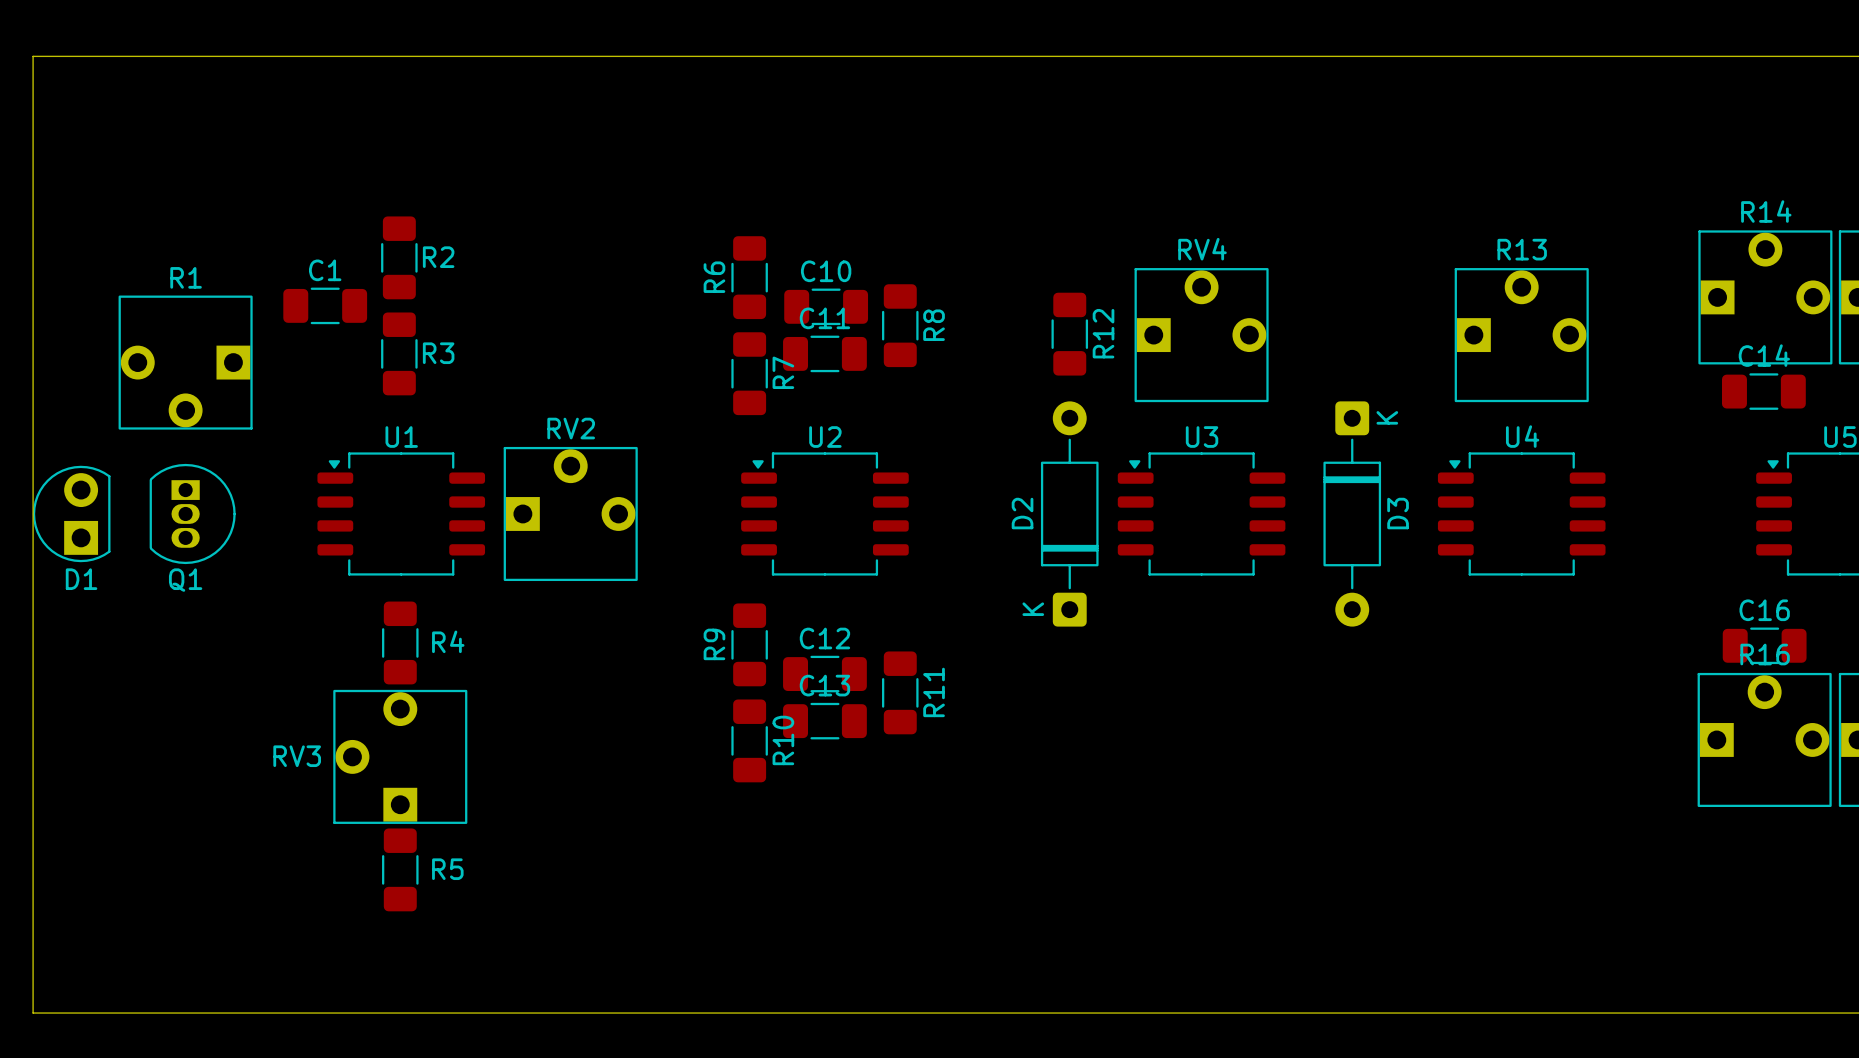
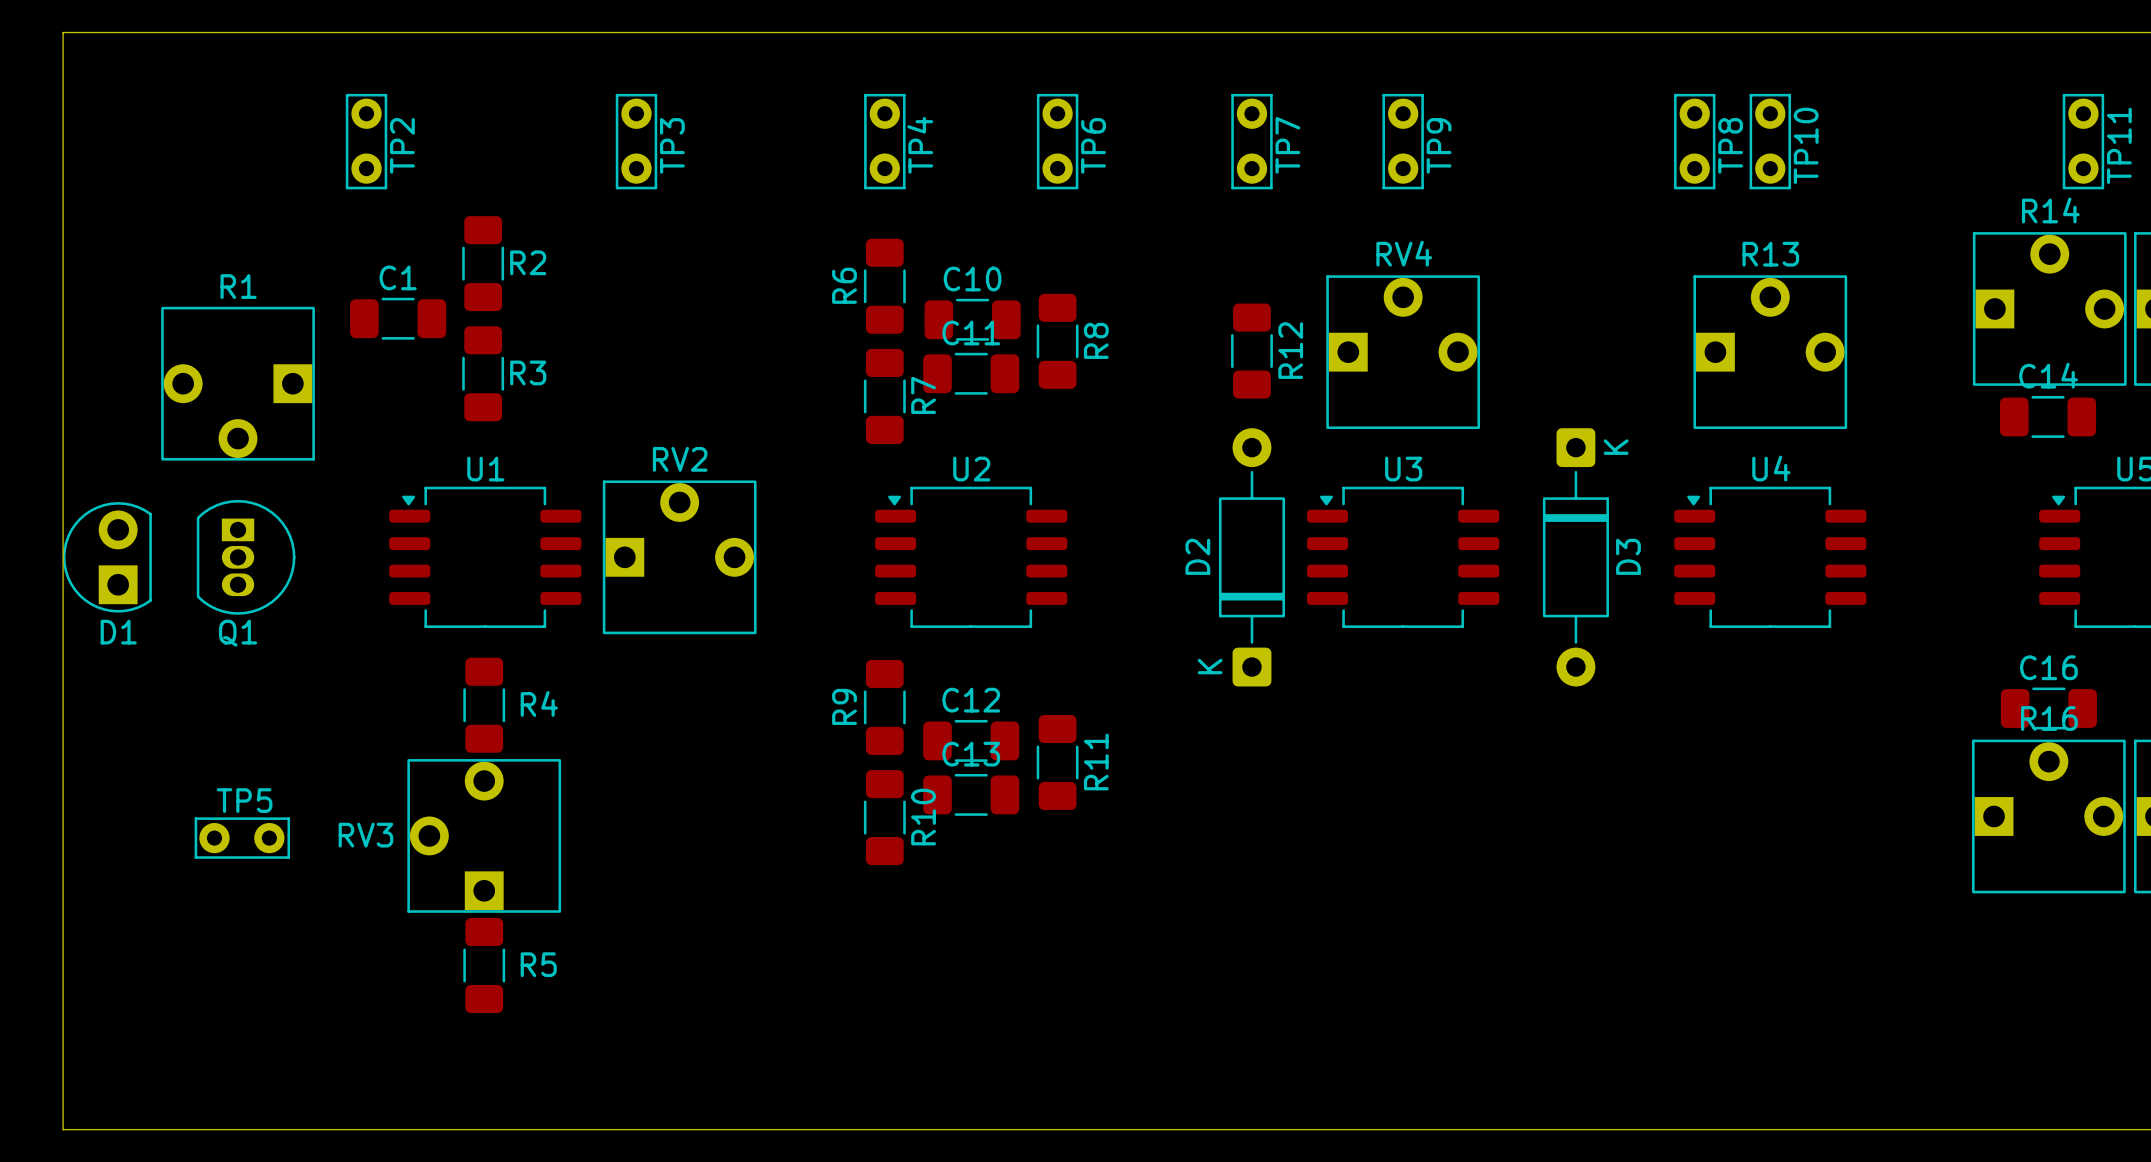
TP2: none -> (366, 141)
TP3: none -> (636, 141)
TP4: none -> (884, 141)
TP6: none -> (1057, 141)
TP7: none -> (1251, 141)
TP9: none -> (1403, 141)
TP8: none -> (1694, 141)
TP10: none -> (1770, 141)
TP11: none -> (2083, 141)
TP5: none -> (242, 838)

